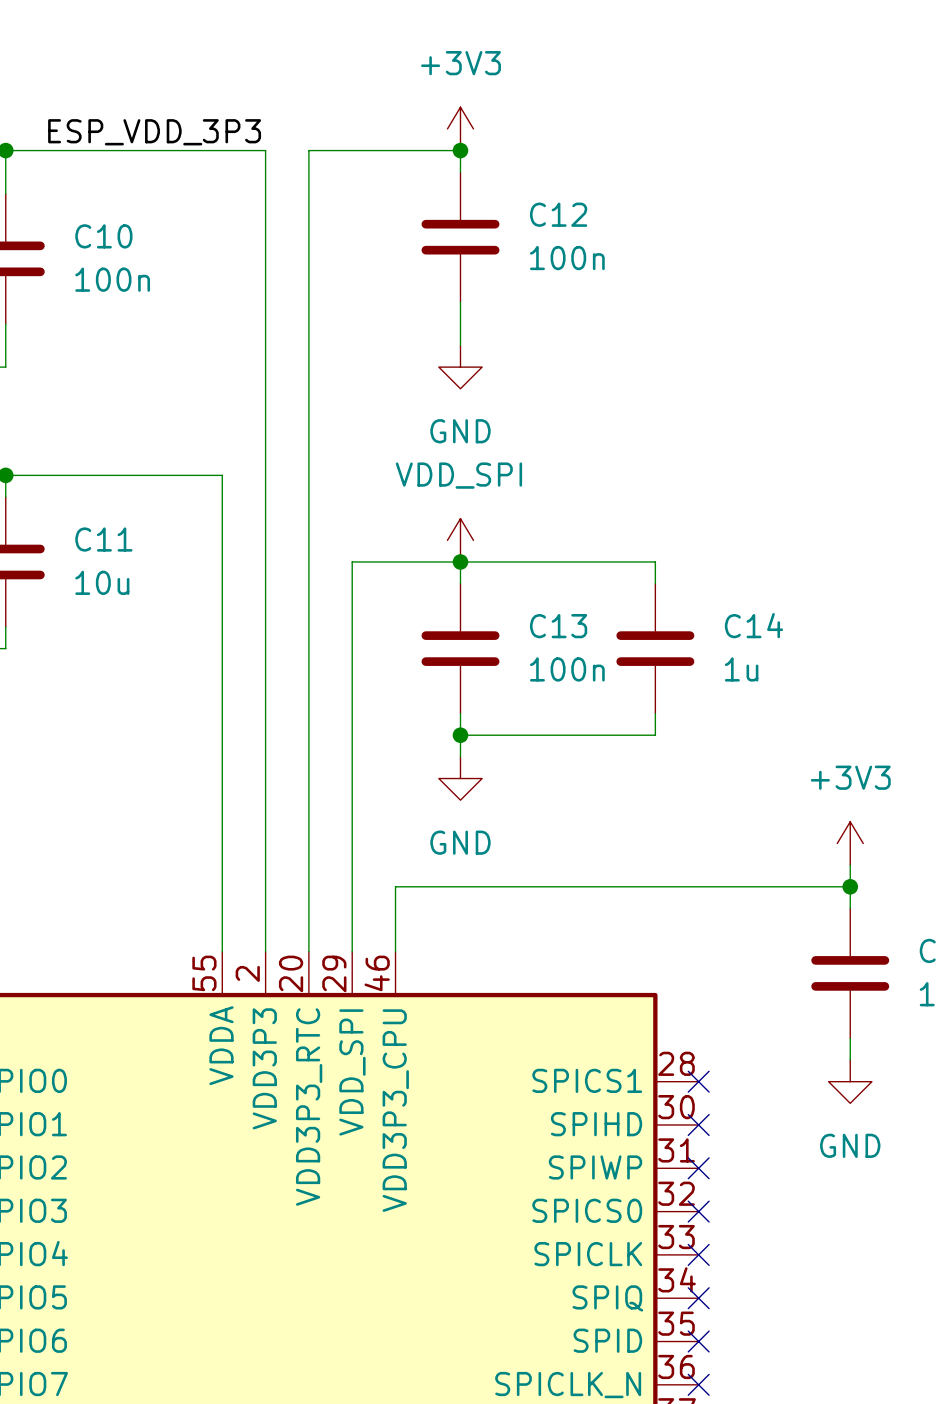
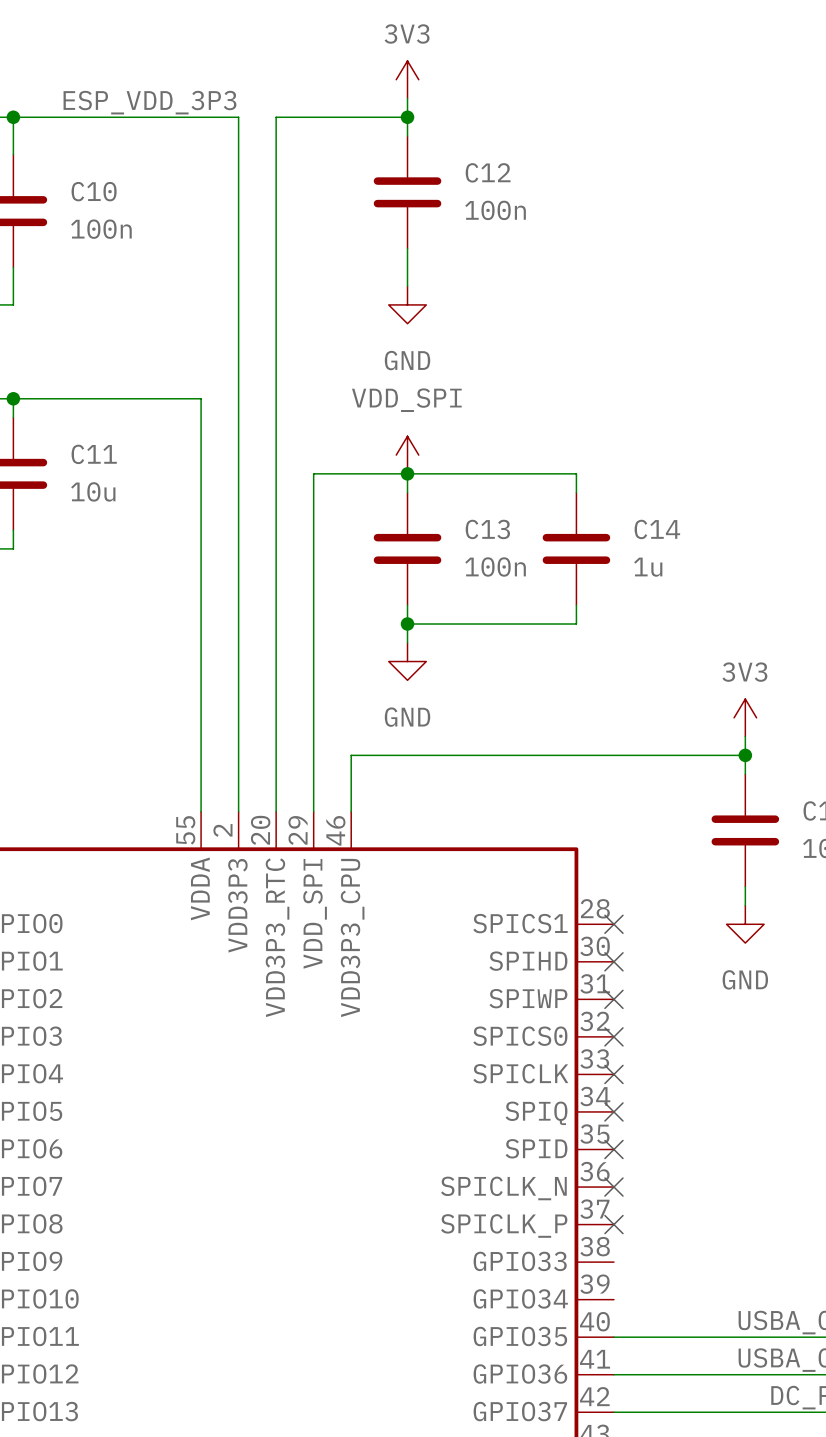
power symbol: none -> 3V3 (407, 79)
power symbol: +3V3 (460, 128) -> none
power symbol: +3V3 (850, 843) -> 3V3 (745, 717)

